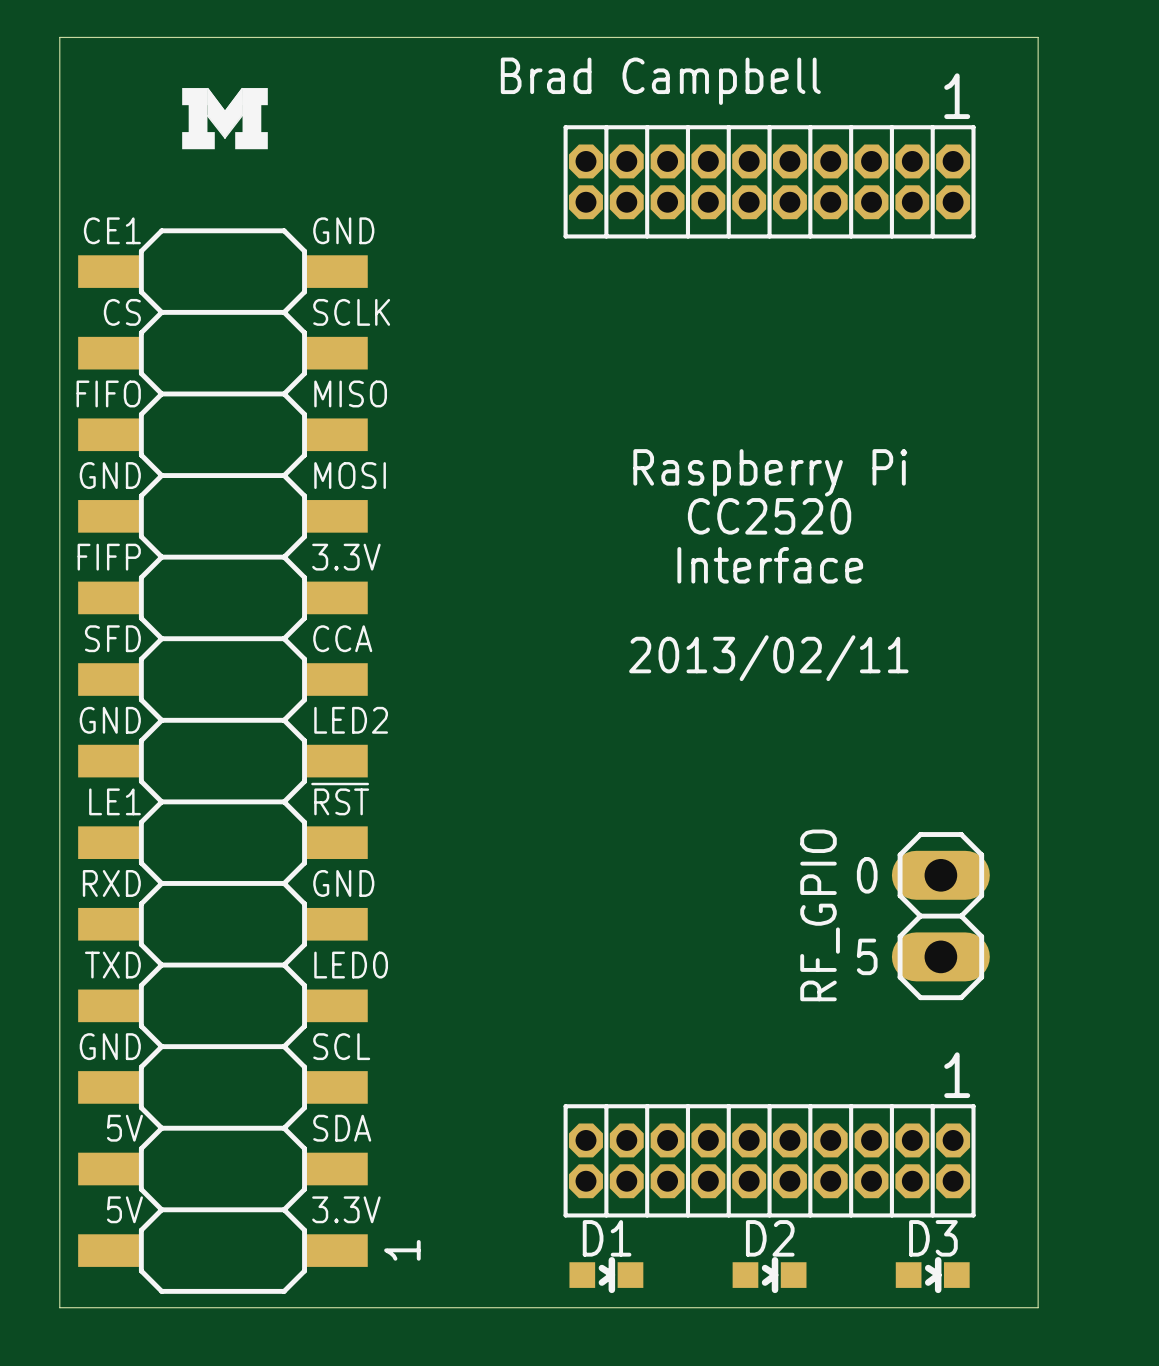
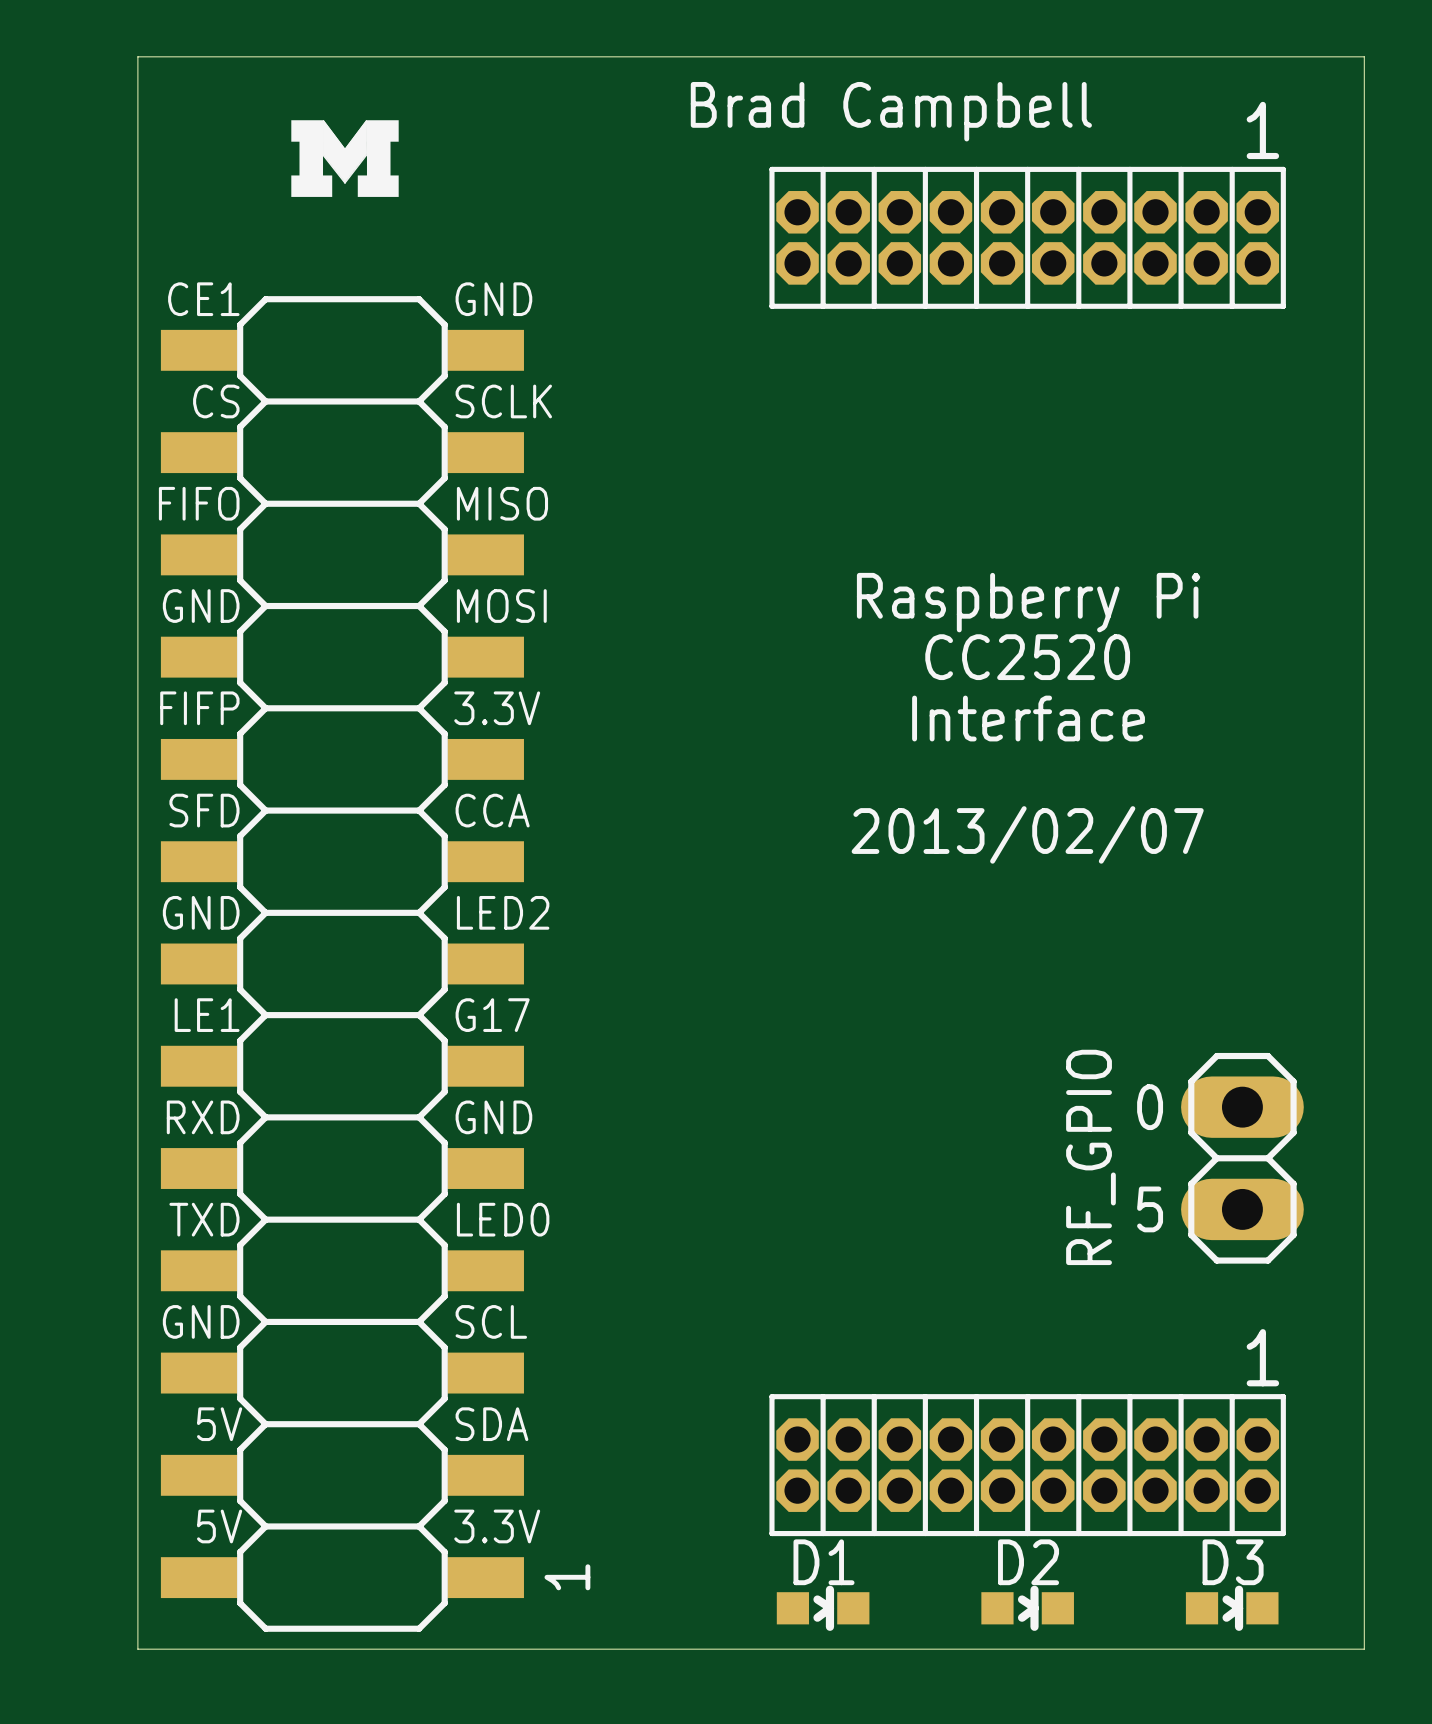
text: 2013/02/11 (768, 658) -> 2013/02/07 (1027, 834)
text: ~{RST} (340, 799) -> G17 (492, 1015)

